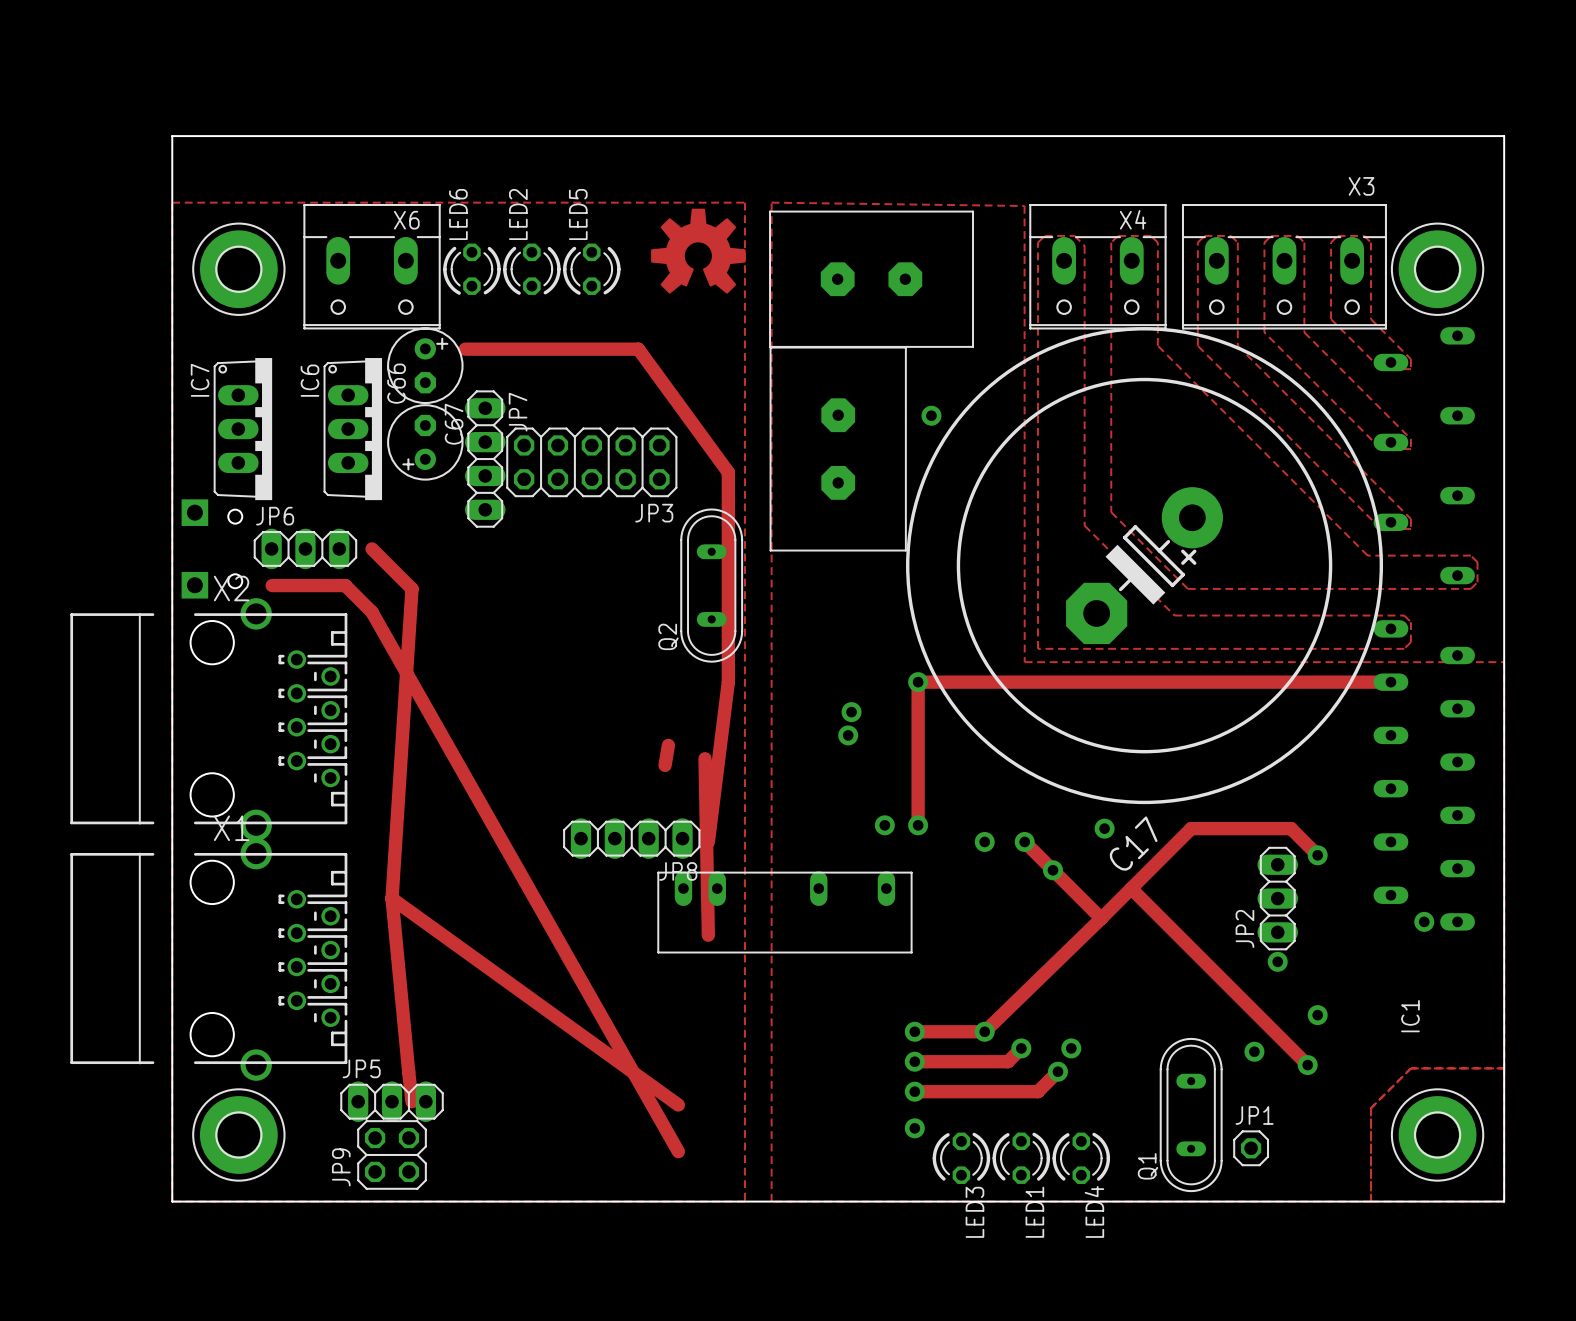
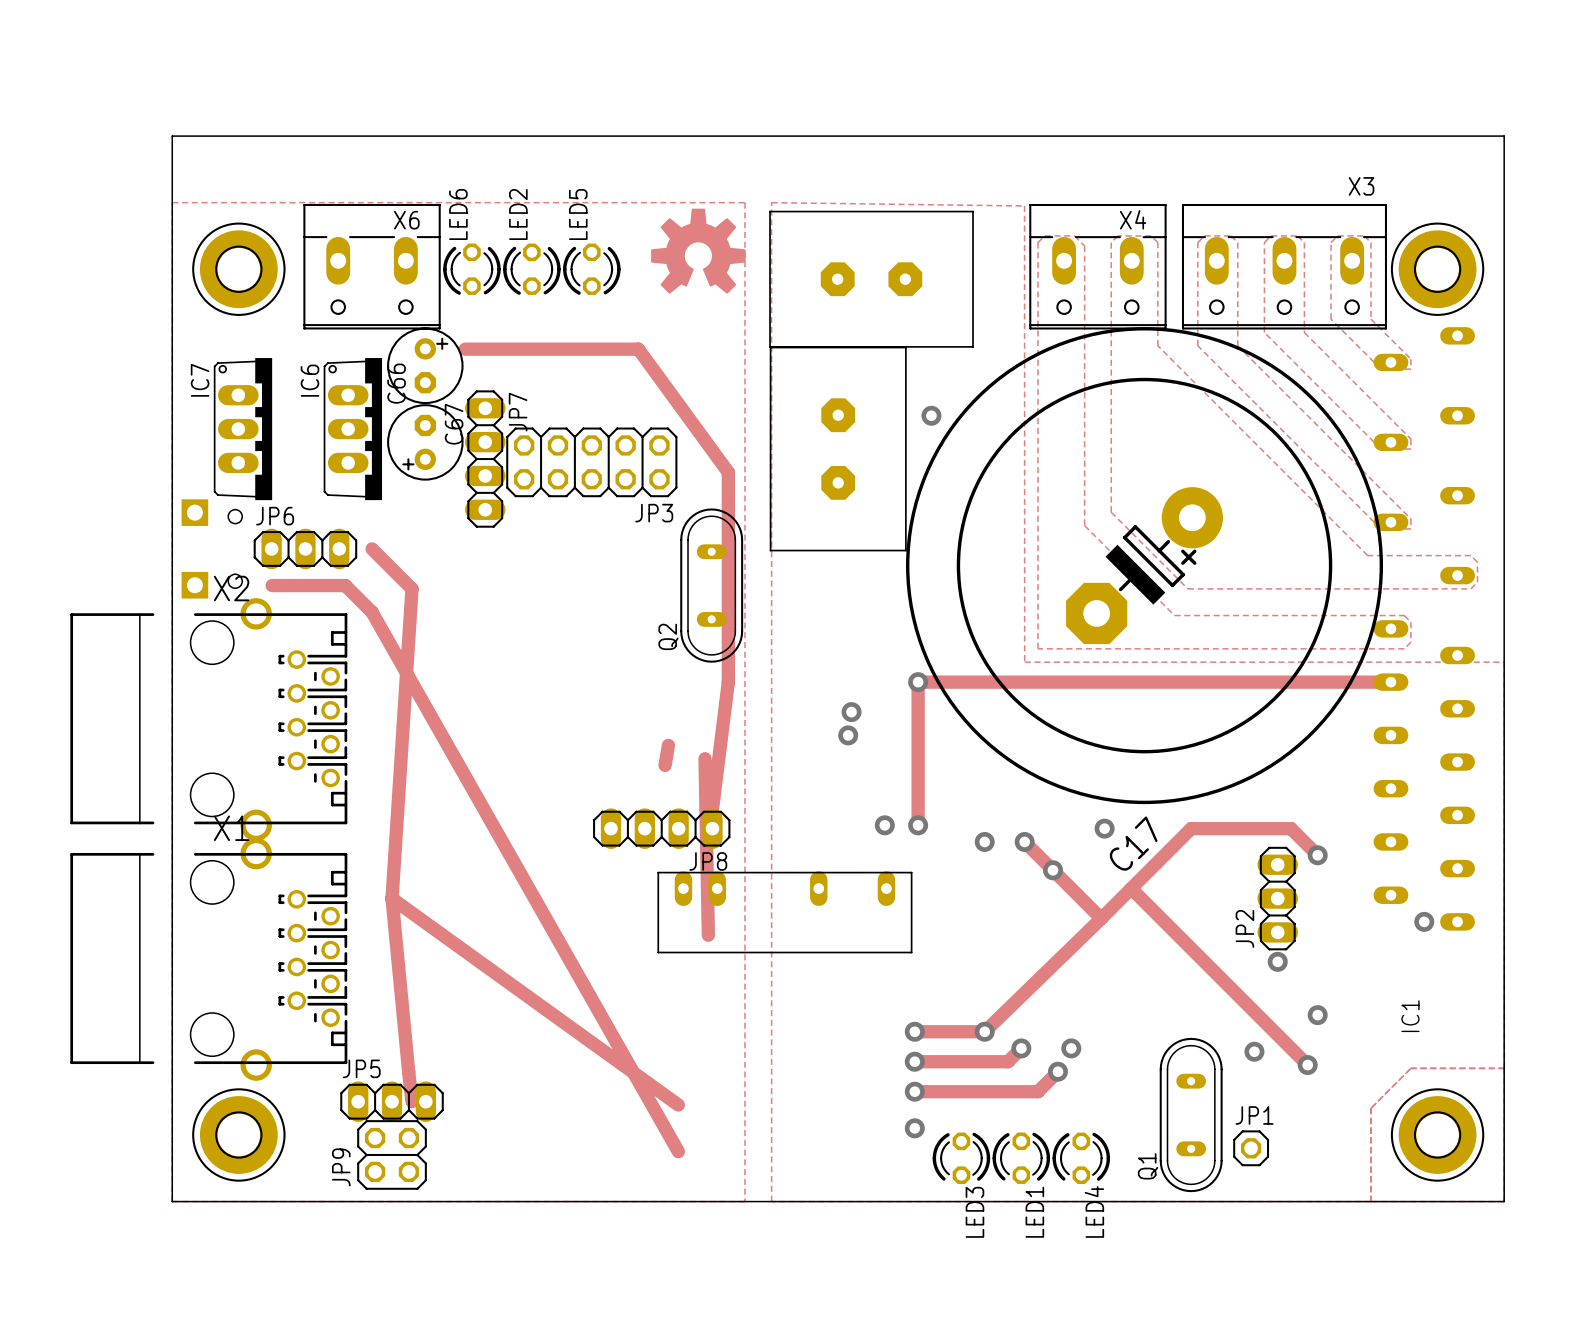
JP8 position: (631, 838) -> (661, 828)

